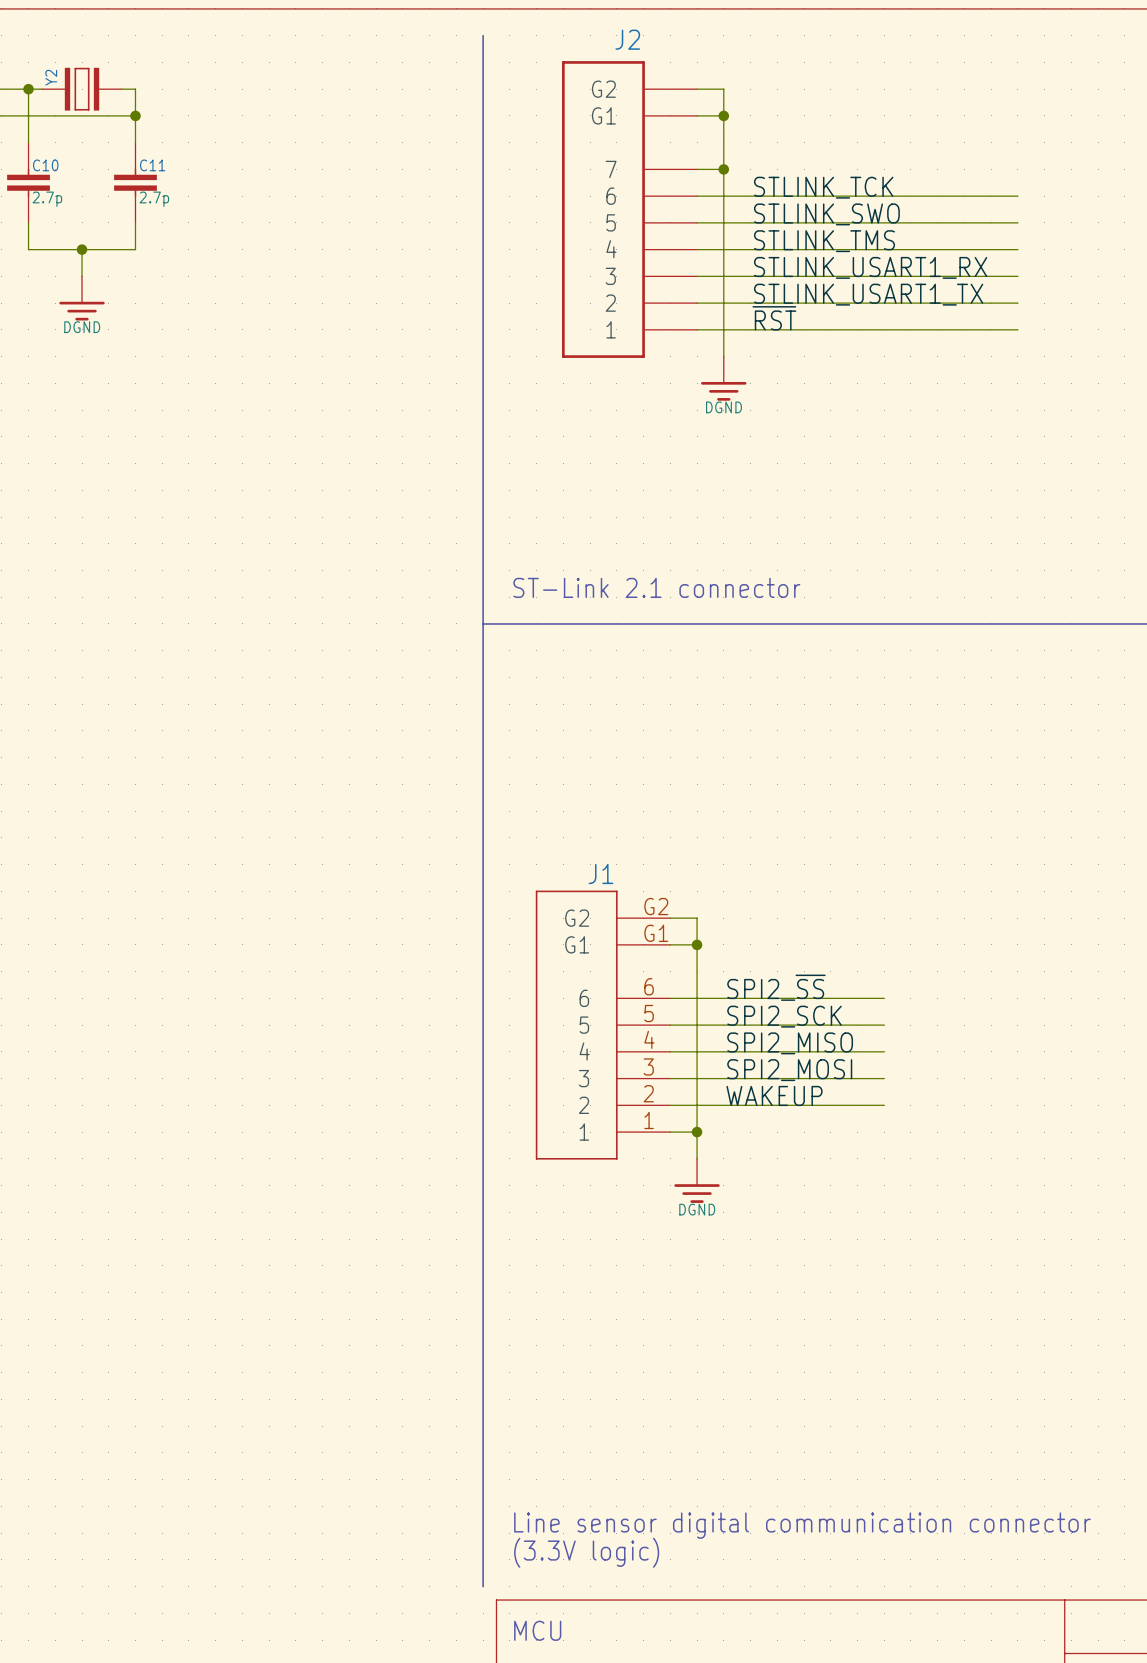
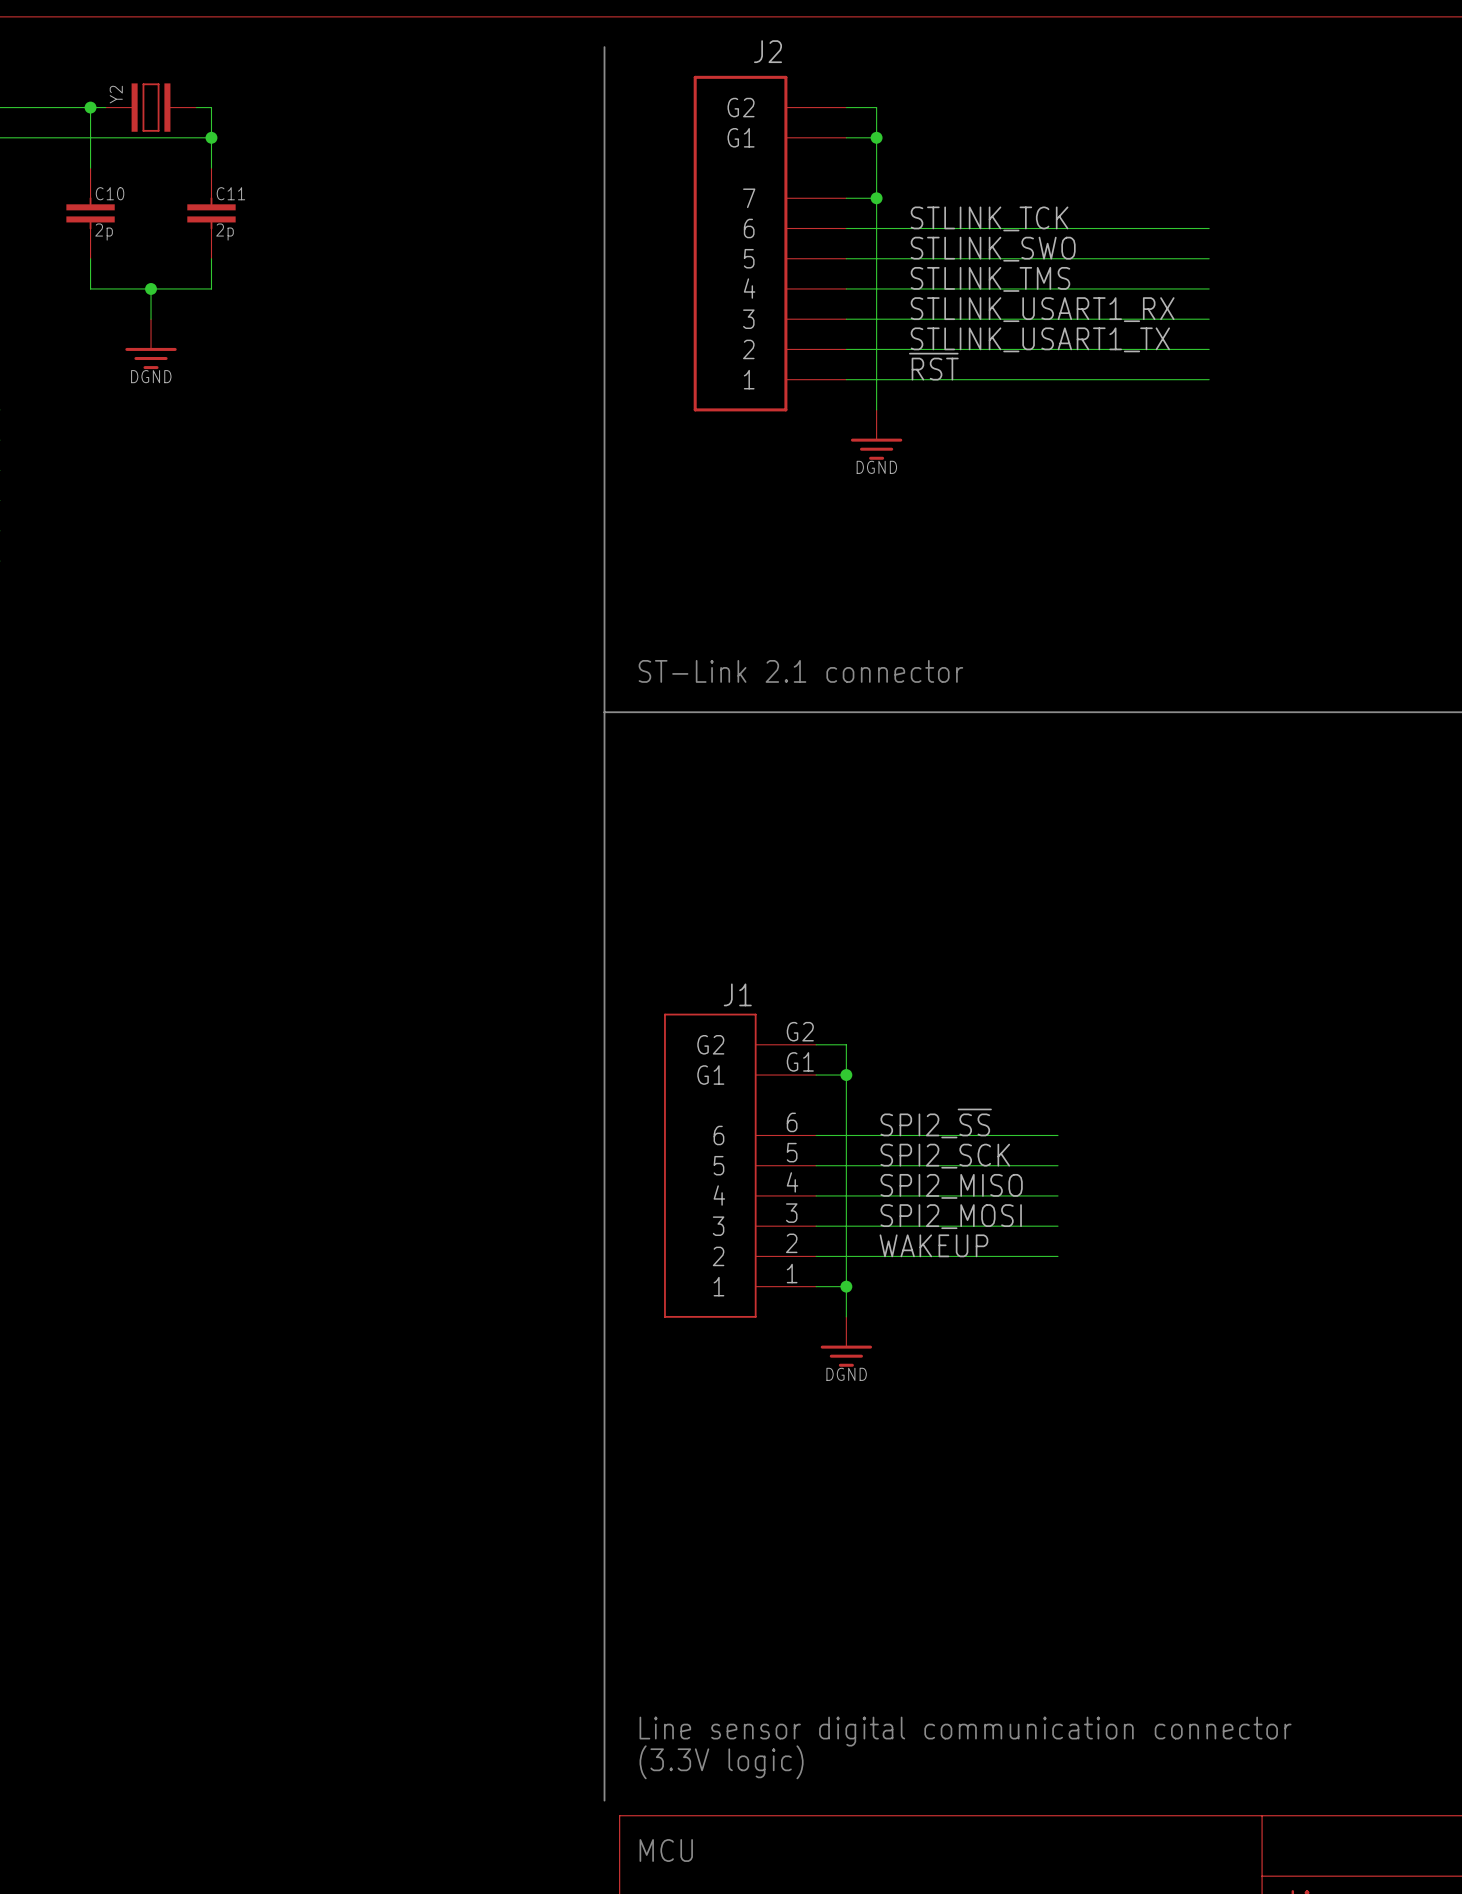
C10 value: 2.7p (47, 199) -> 2p (104, 232)
C11 value: 2.7p (154, 199) -> 2p (224, 232)

